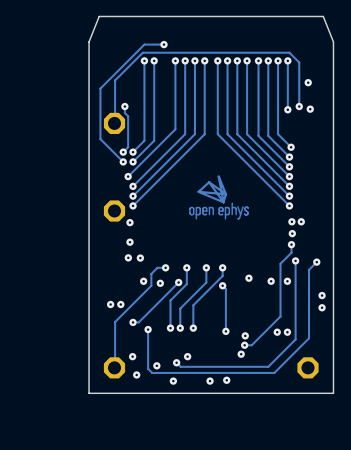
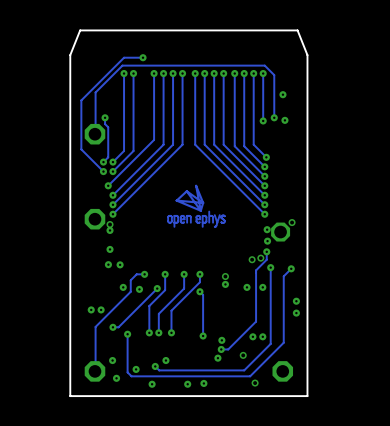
via: none -> (292, 222)
via: none -> (110, 224)
via: (301, 221) -> none
part: none -> (280, 232)
via: none -> (260, 258)
via: none -> (252, 259)
via: none -> (225, 276)
via: none -> (243, 355)
via: none -> (255, 383)

